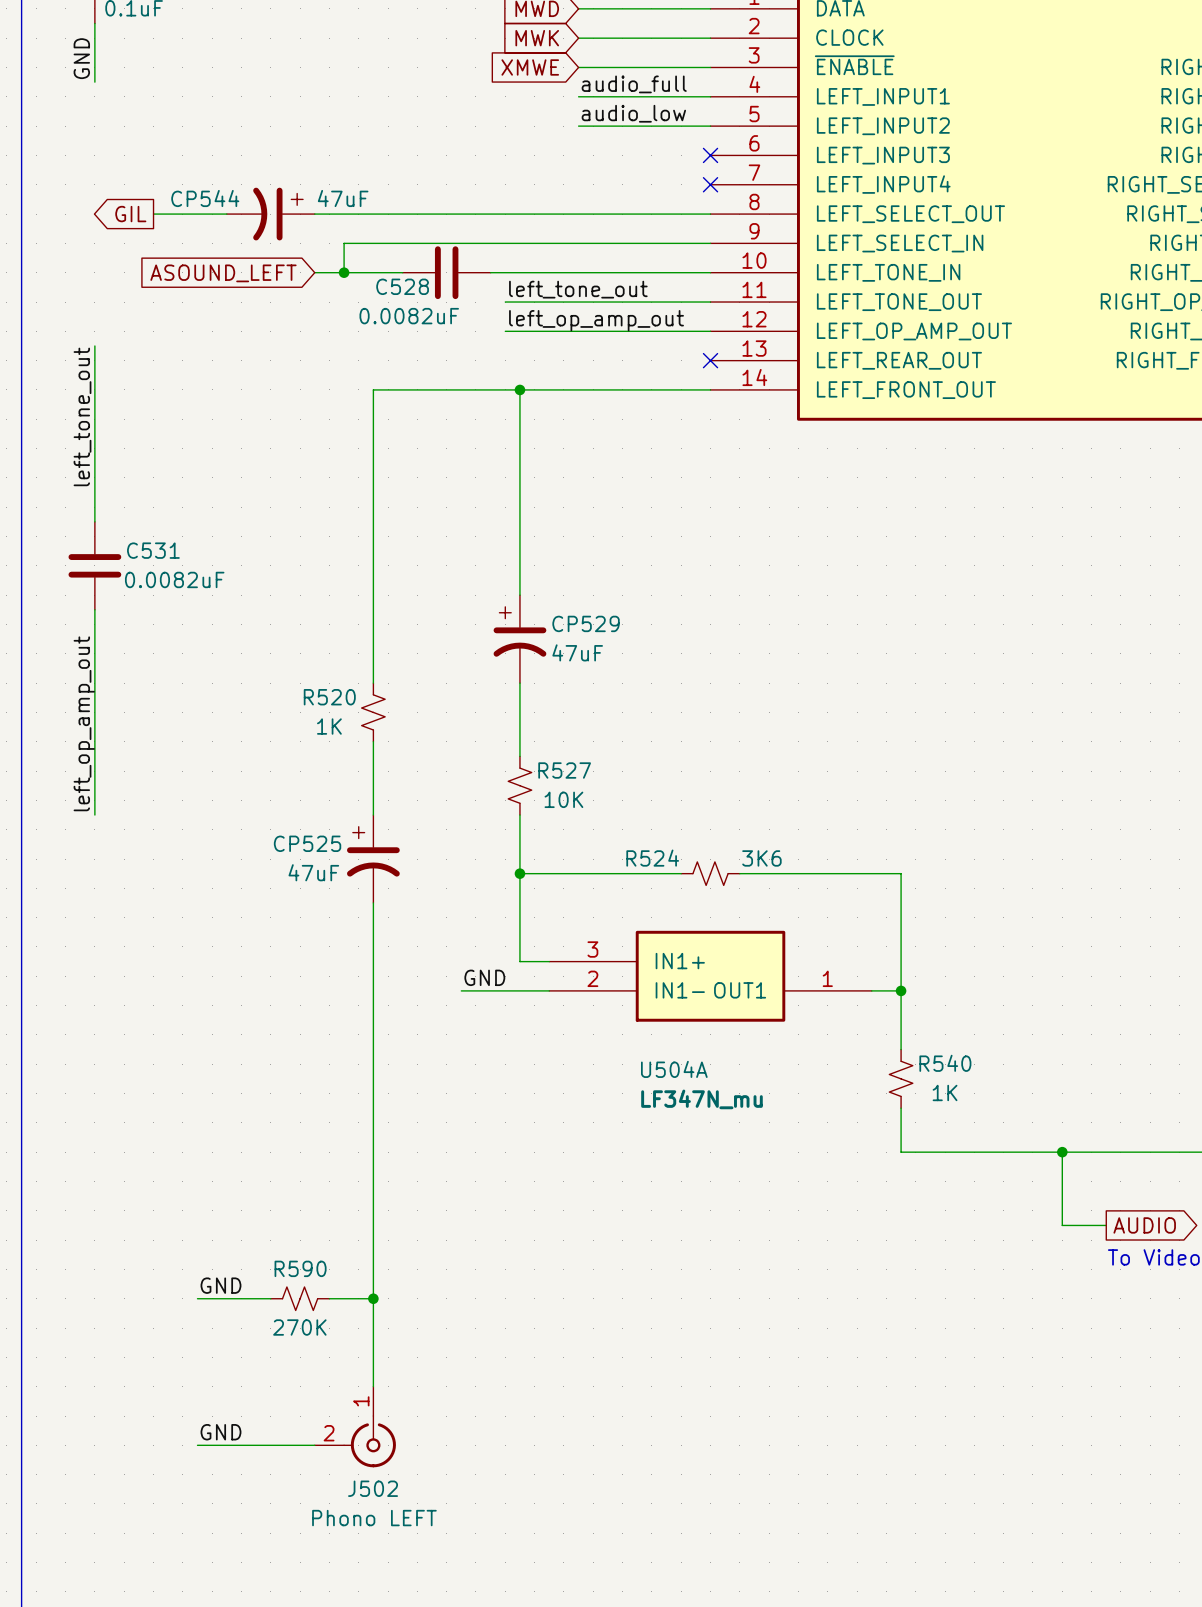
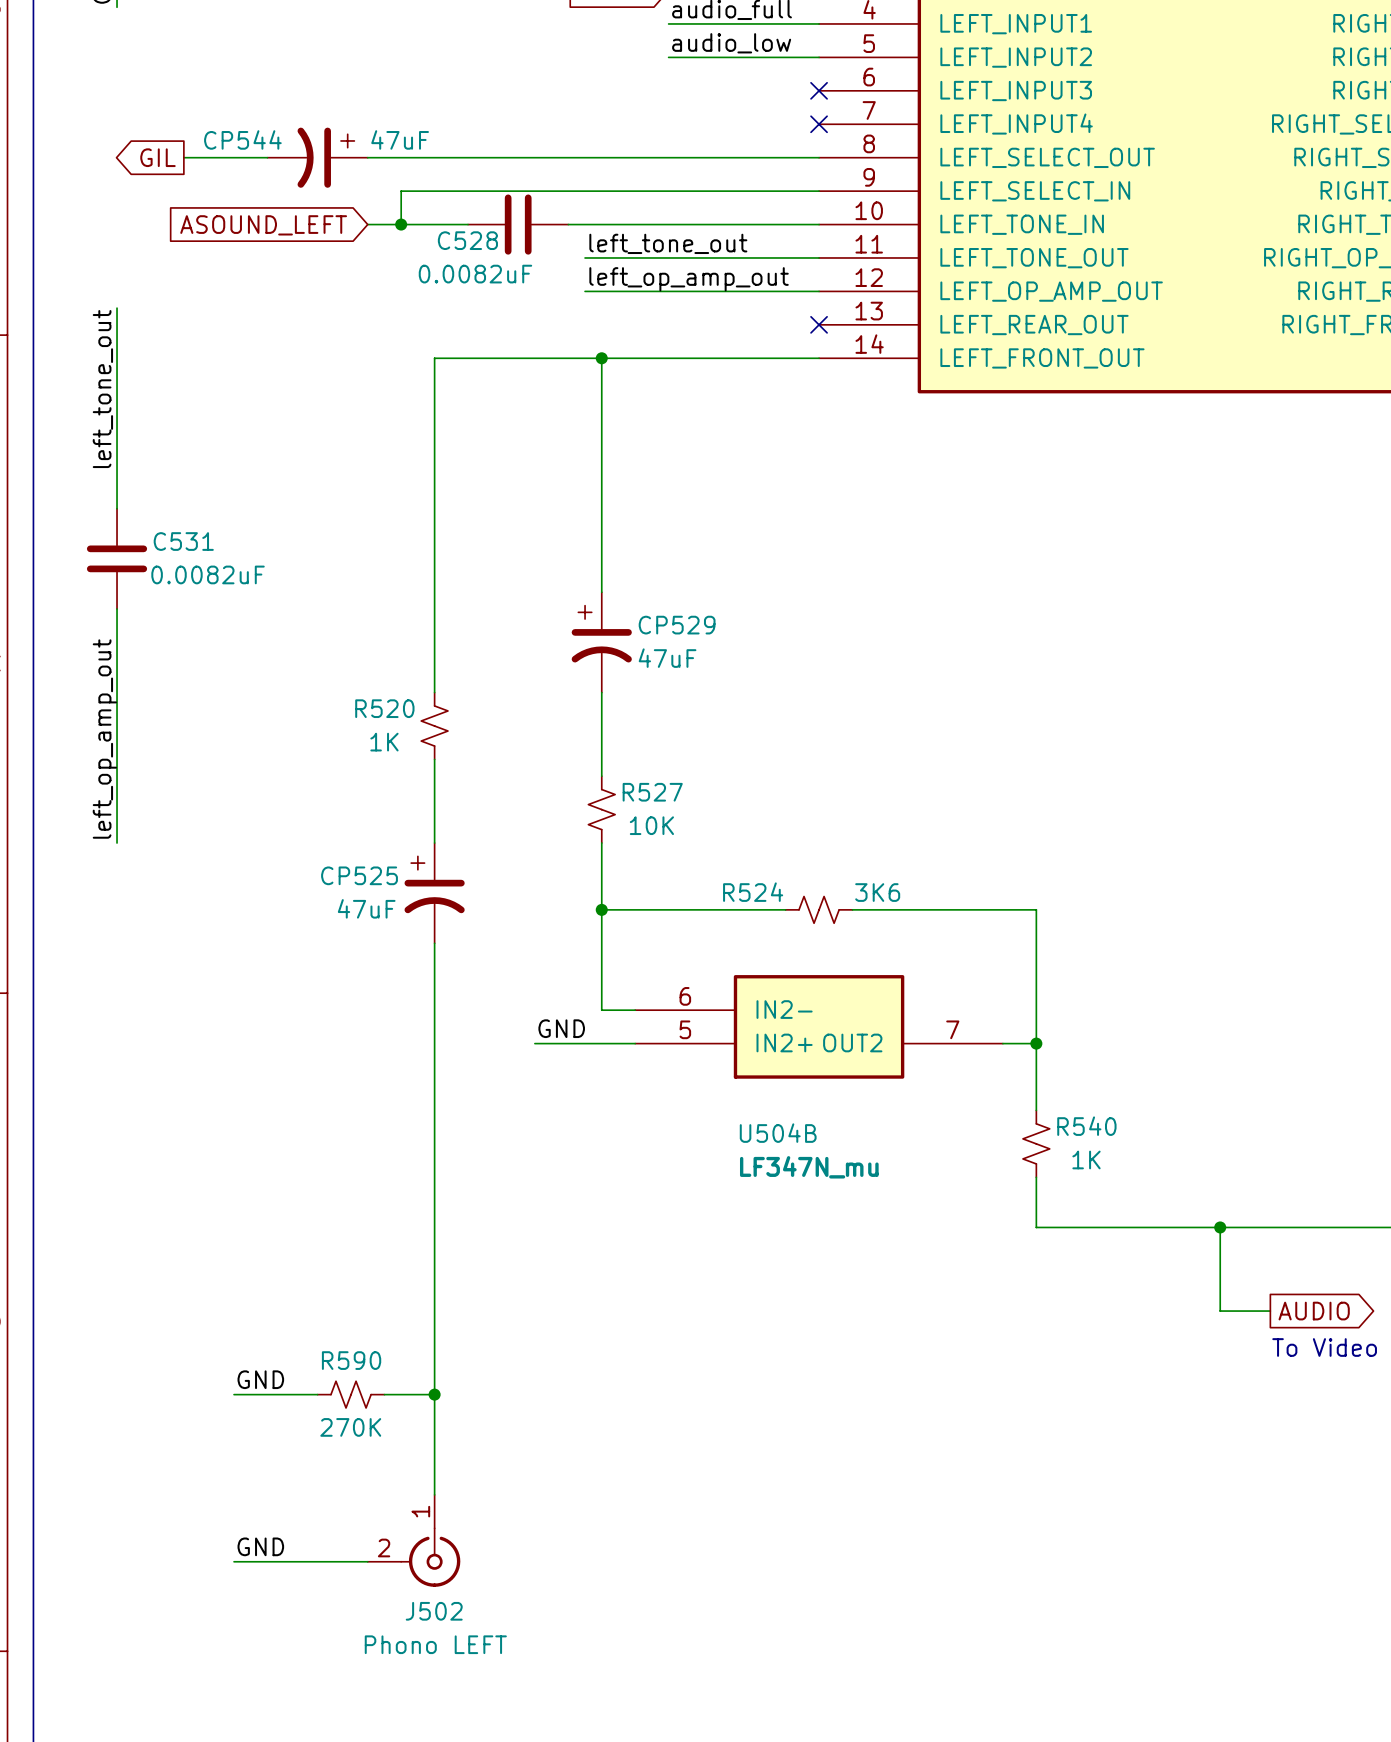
U504A pin number: 3 (592, 949) -> 6 (685, 996)
U504A pin name: IN1+ (680, 961) -> IN2- (784, 1009)
U504A pin number: 2 (592, 978) -> 5 (685, 1029)
U504A pin number: 1 (827, 978) -> 7 (952, 1029)
U504A pin name: IN1- (680, 990) -> IN2+ (784, 1042)
U504A pin name: OUT1 (740, 990) -> OUT2 (852, 1042)
U504A name: U504A (674, 1069) -> U504B (778, 1133)

